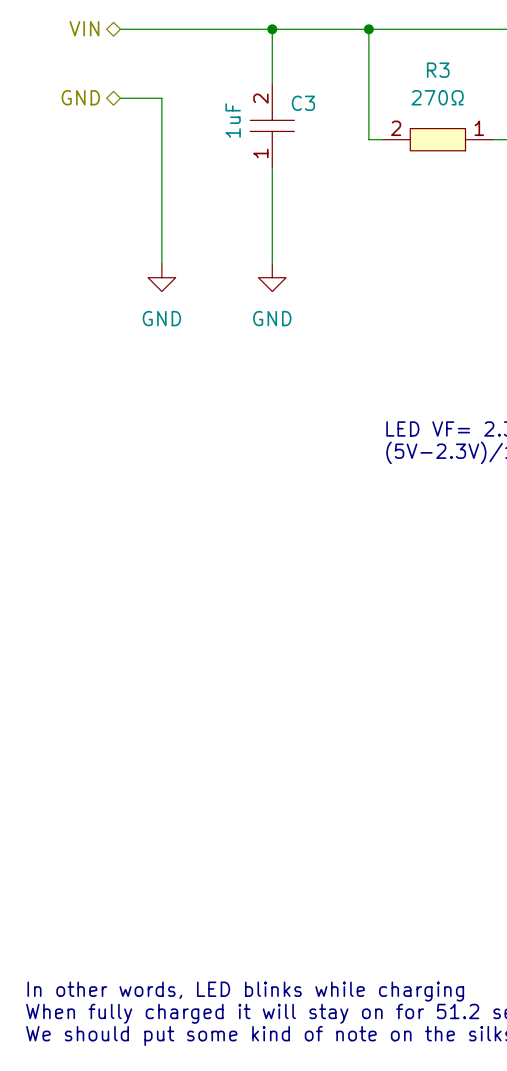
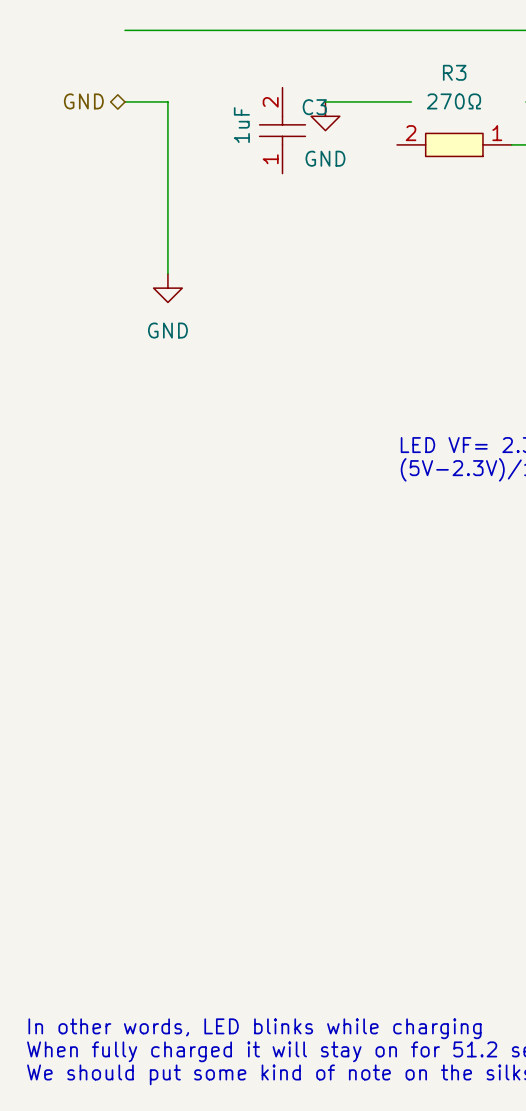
hierarchical label: VIN (84, 28) -> none
wire: (272, 29) (272, 84) -> none
junction: (272, 29) -> none
wire: (368, 29) (368, 139) (382, 139) -> none
junction: (368, 29) -> none
wire: none -> (325, 101) (411, 101)
wire: (272, 167) (272, 263) -> none
power symbol position: GND (272, 277) -> GND (325, 116)

